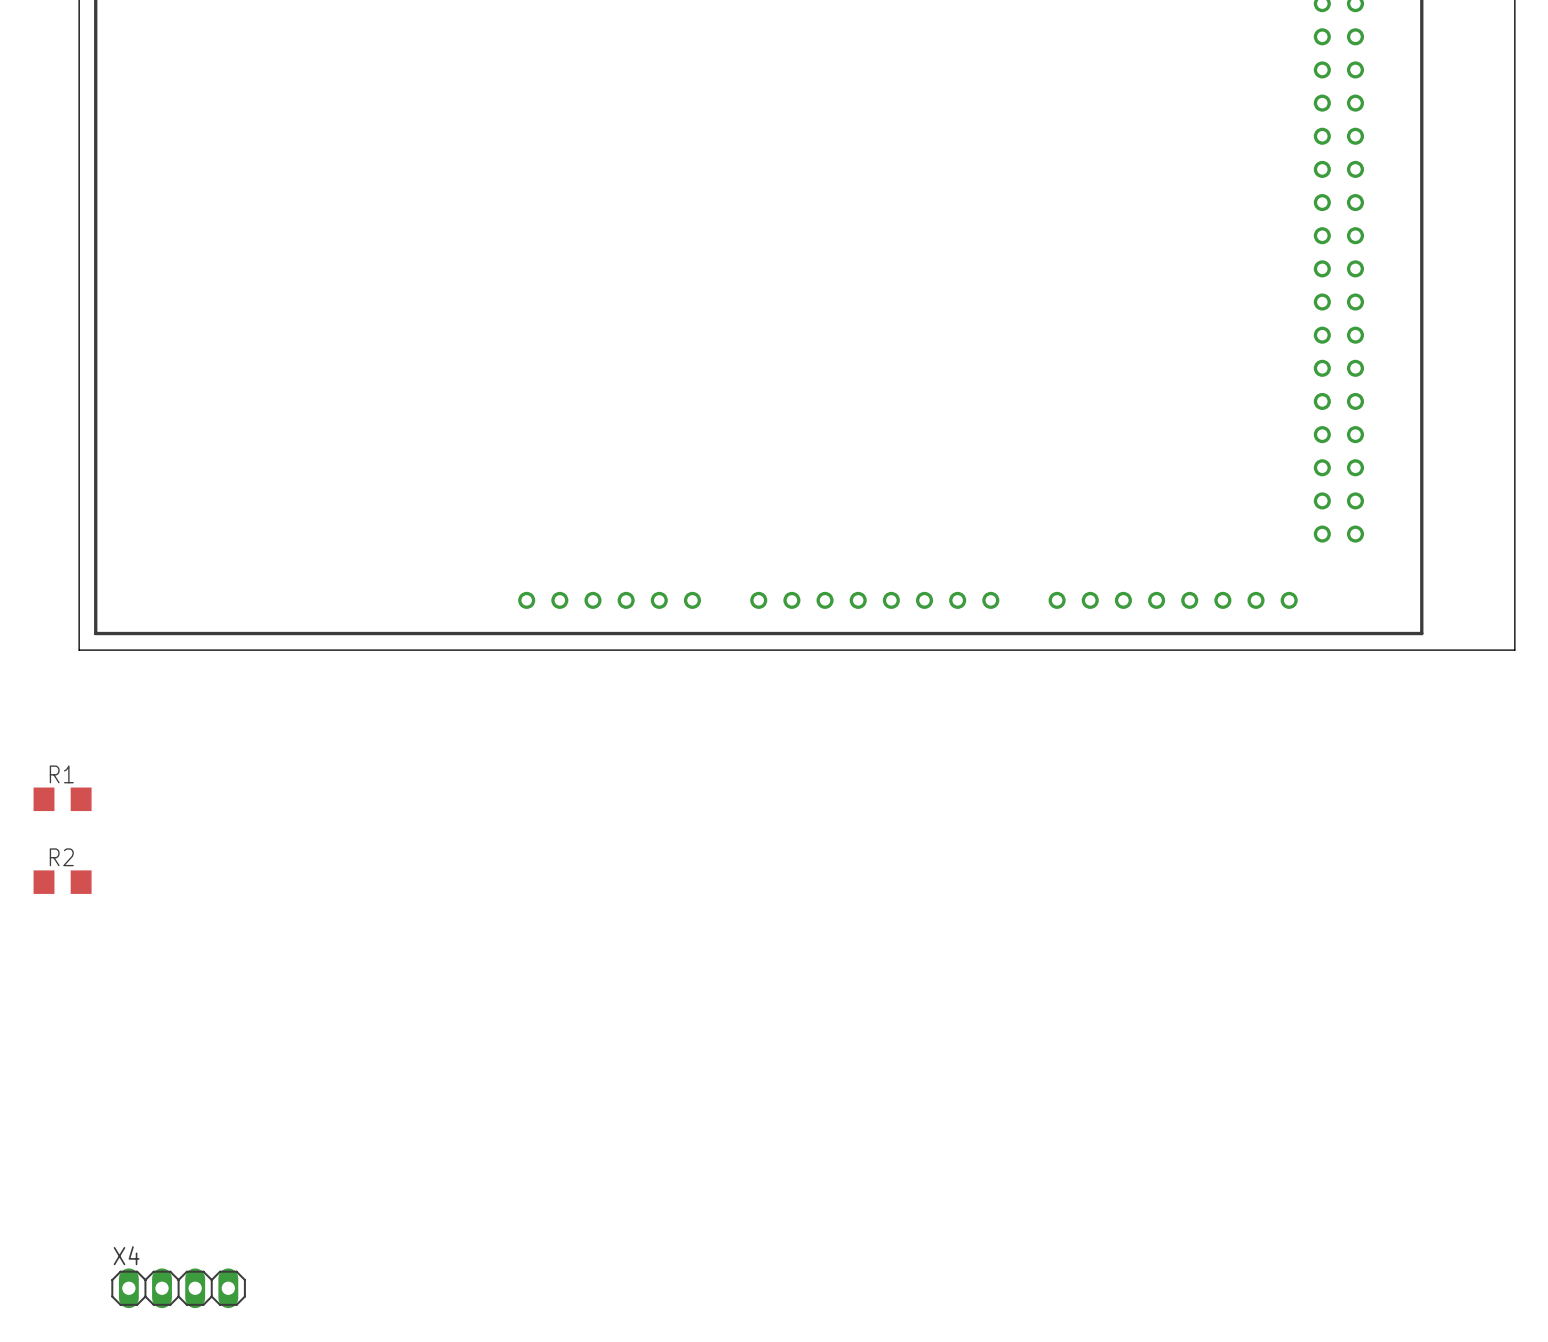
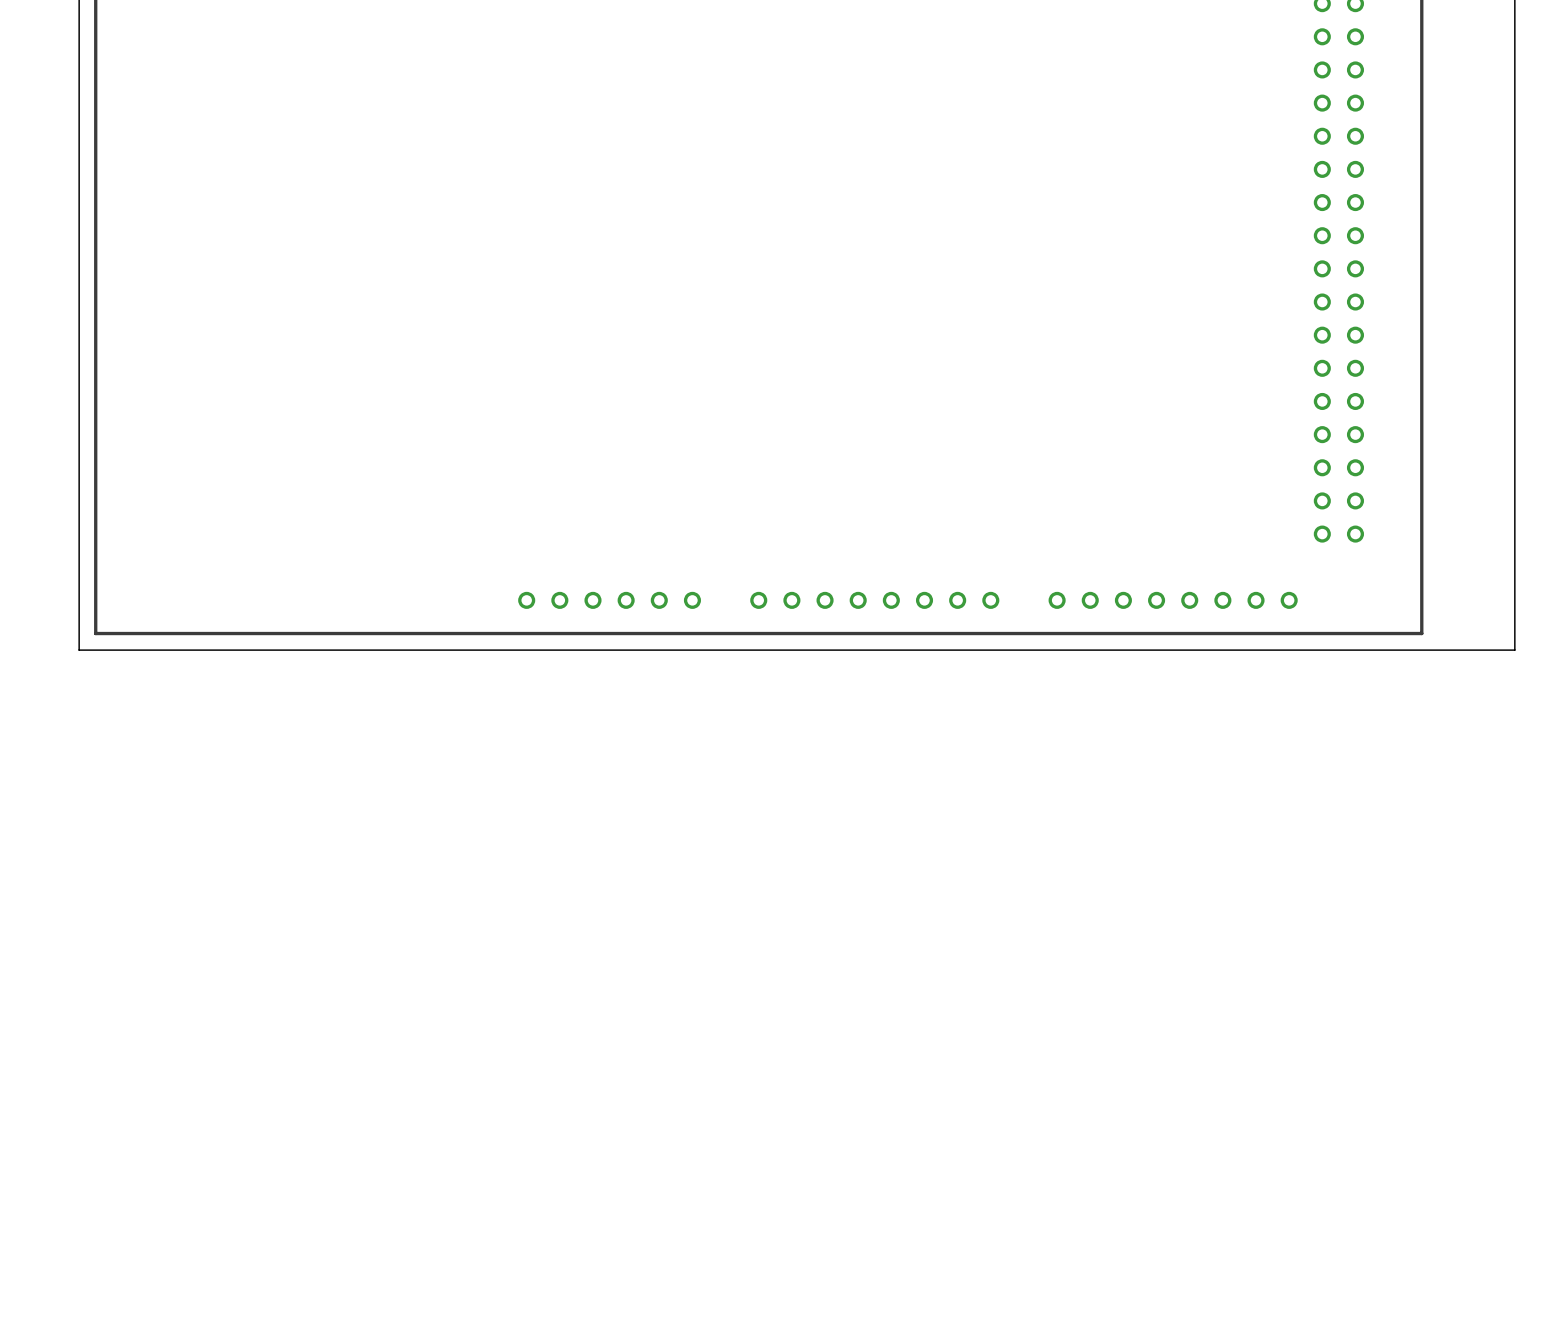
R1: (62, 799) -> none
R2: (62, 882) -> none
X4: (178, 1288) -> none

